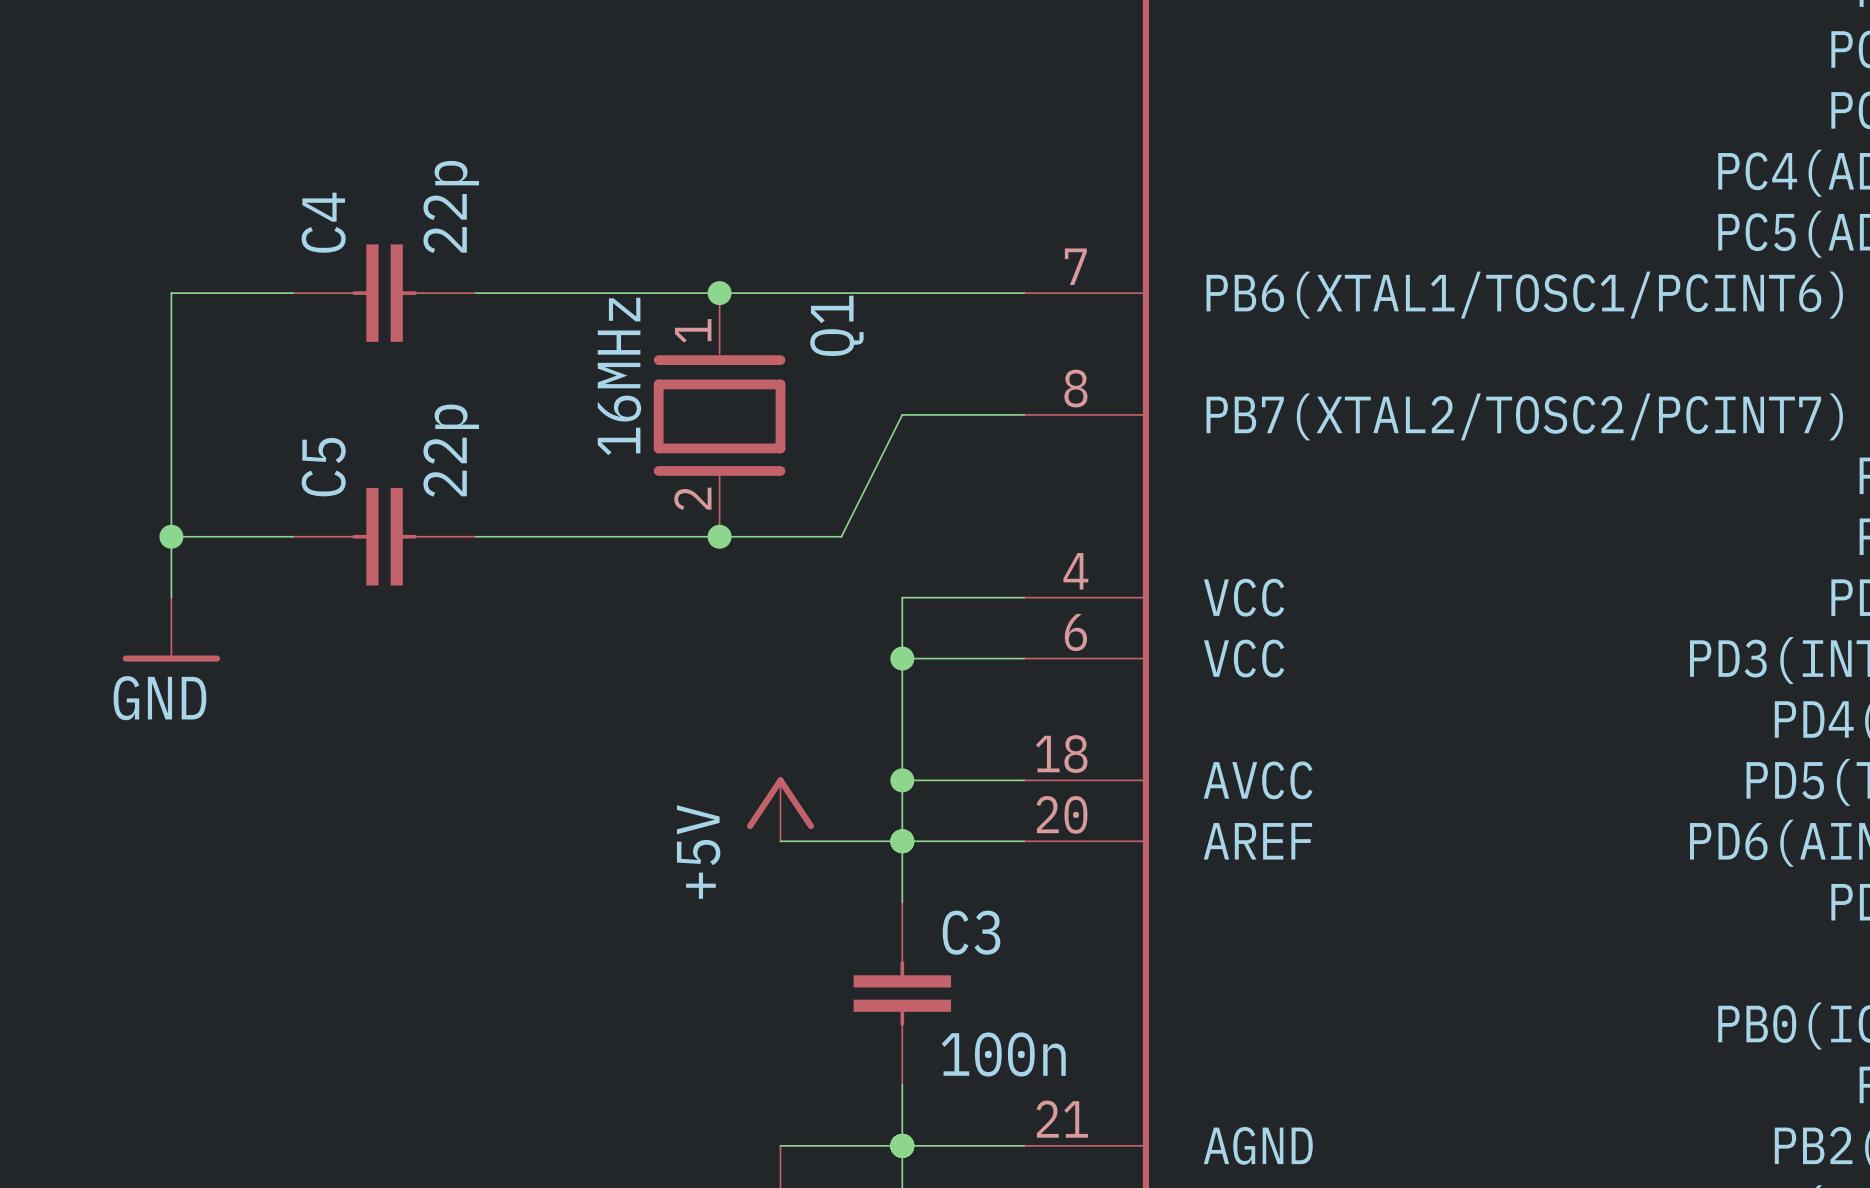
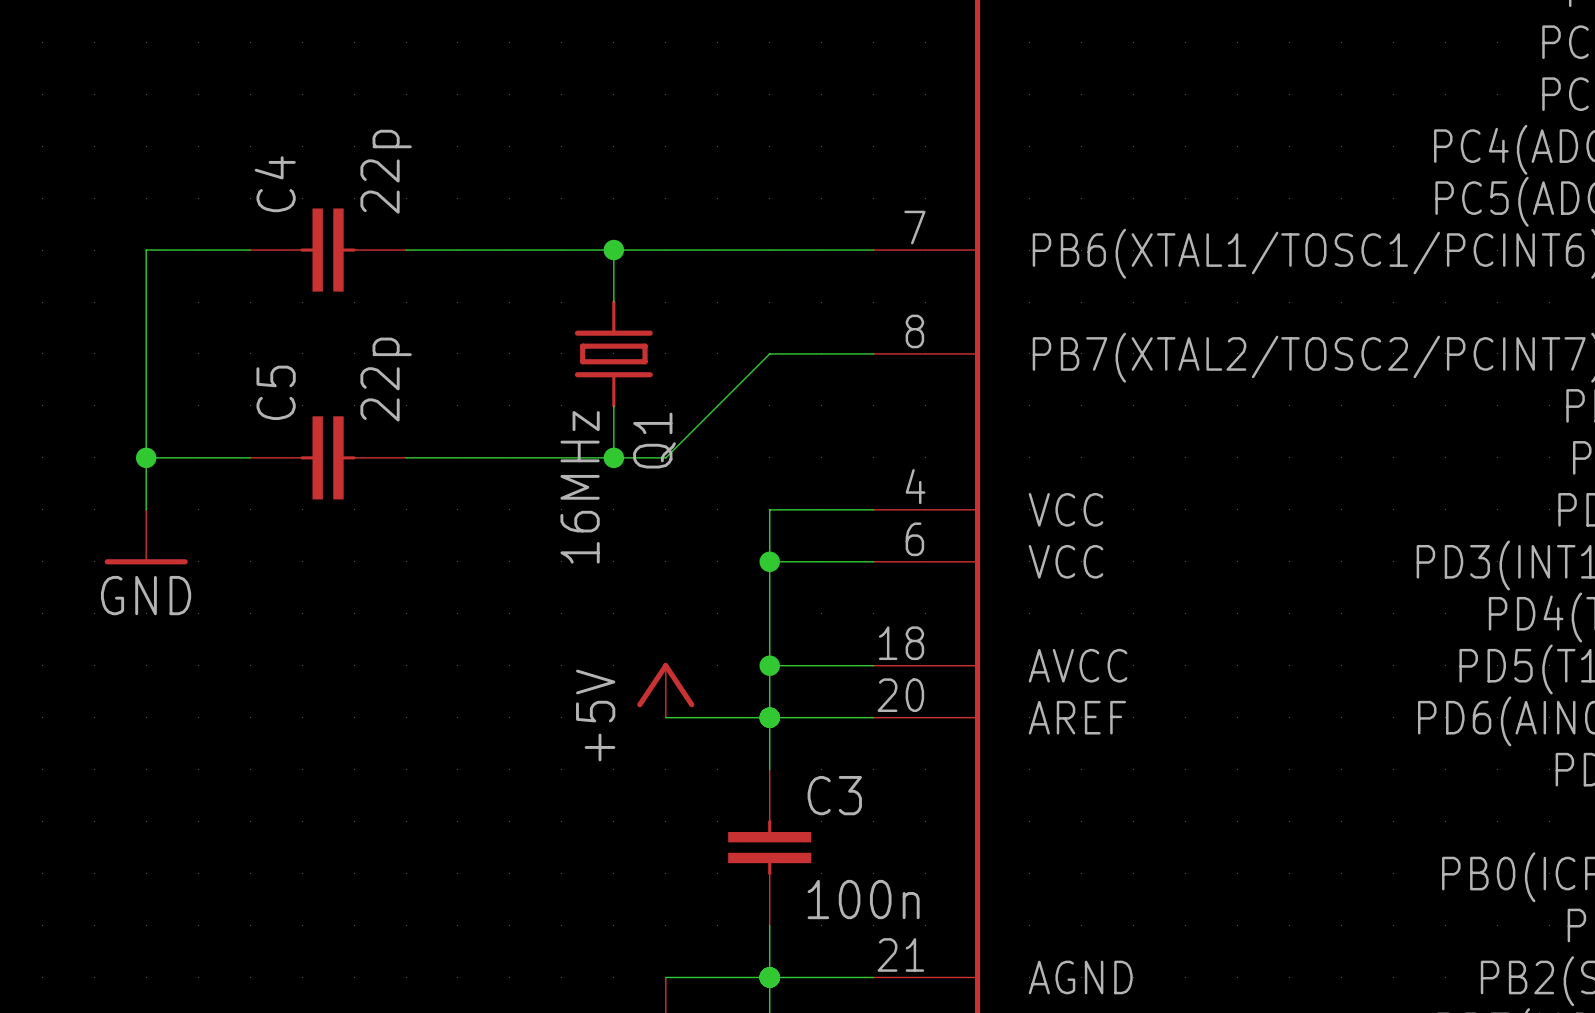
Q1 symbol: [653, 293, 786, 537] -> [574, 300, 653, 408]
Q1 name position: Q1 (836, 325) -> Q1 (654, 440)
Q1 value position: 16MHz (619, 376) -> 16MHz (580, 487)
wire: (902, 414) (841, 536) (780, 536) -> (769, 353) (665, 457)

